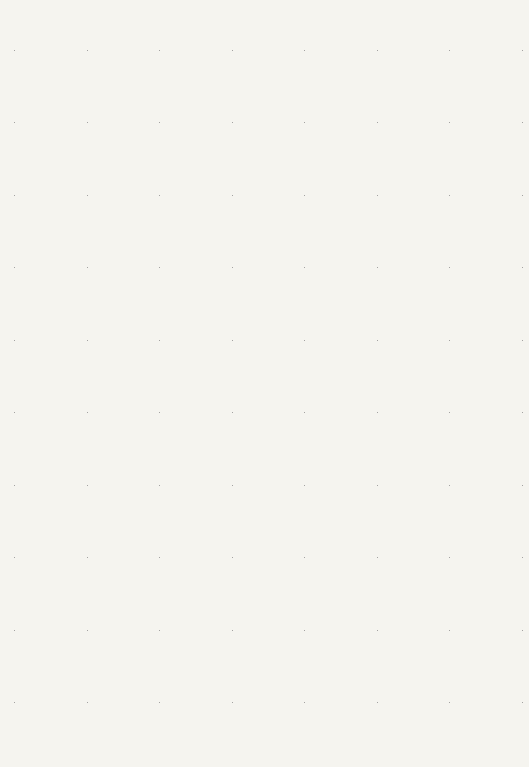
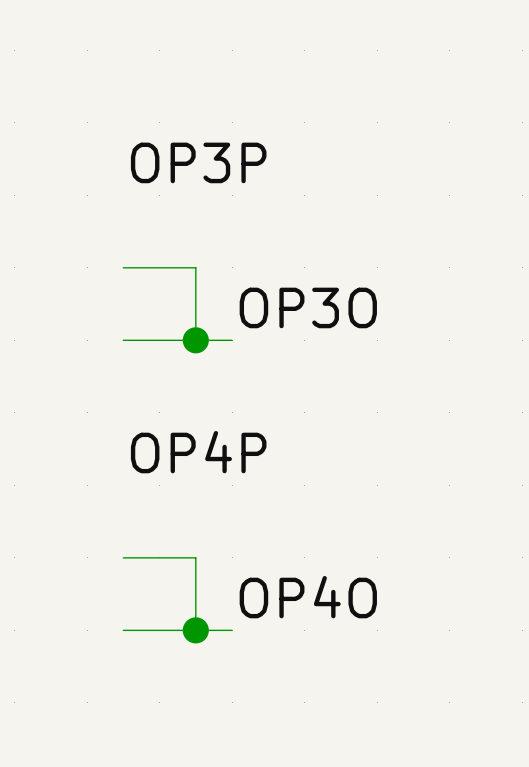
label: none -> OP3P (198, 162)
wire: none -> (123, 267) (195, 267) (195, 340)
label: none -> OP3O (308, 307)
wire: none -> (123, 340) (232, 340)
junction: none -> (195, 340)
label: none -> OP4P (198, 452)
wire: none -> (123, 557) (195, 557) (195, 630)
label: none -> OP4O (308, 597)
wire: none -> (123, 630) (232, 630)
junction: none -> (195, 630)

